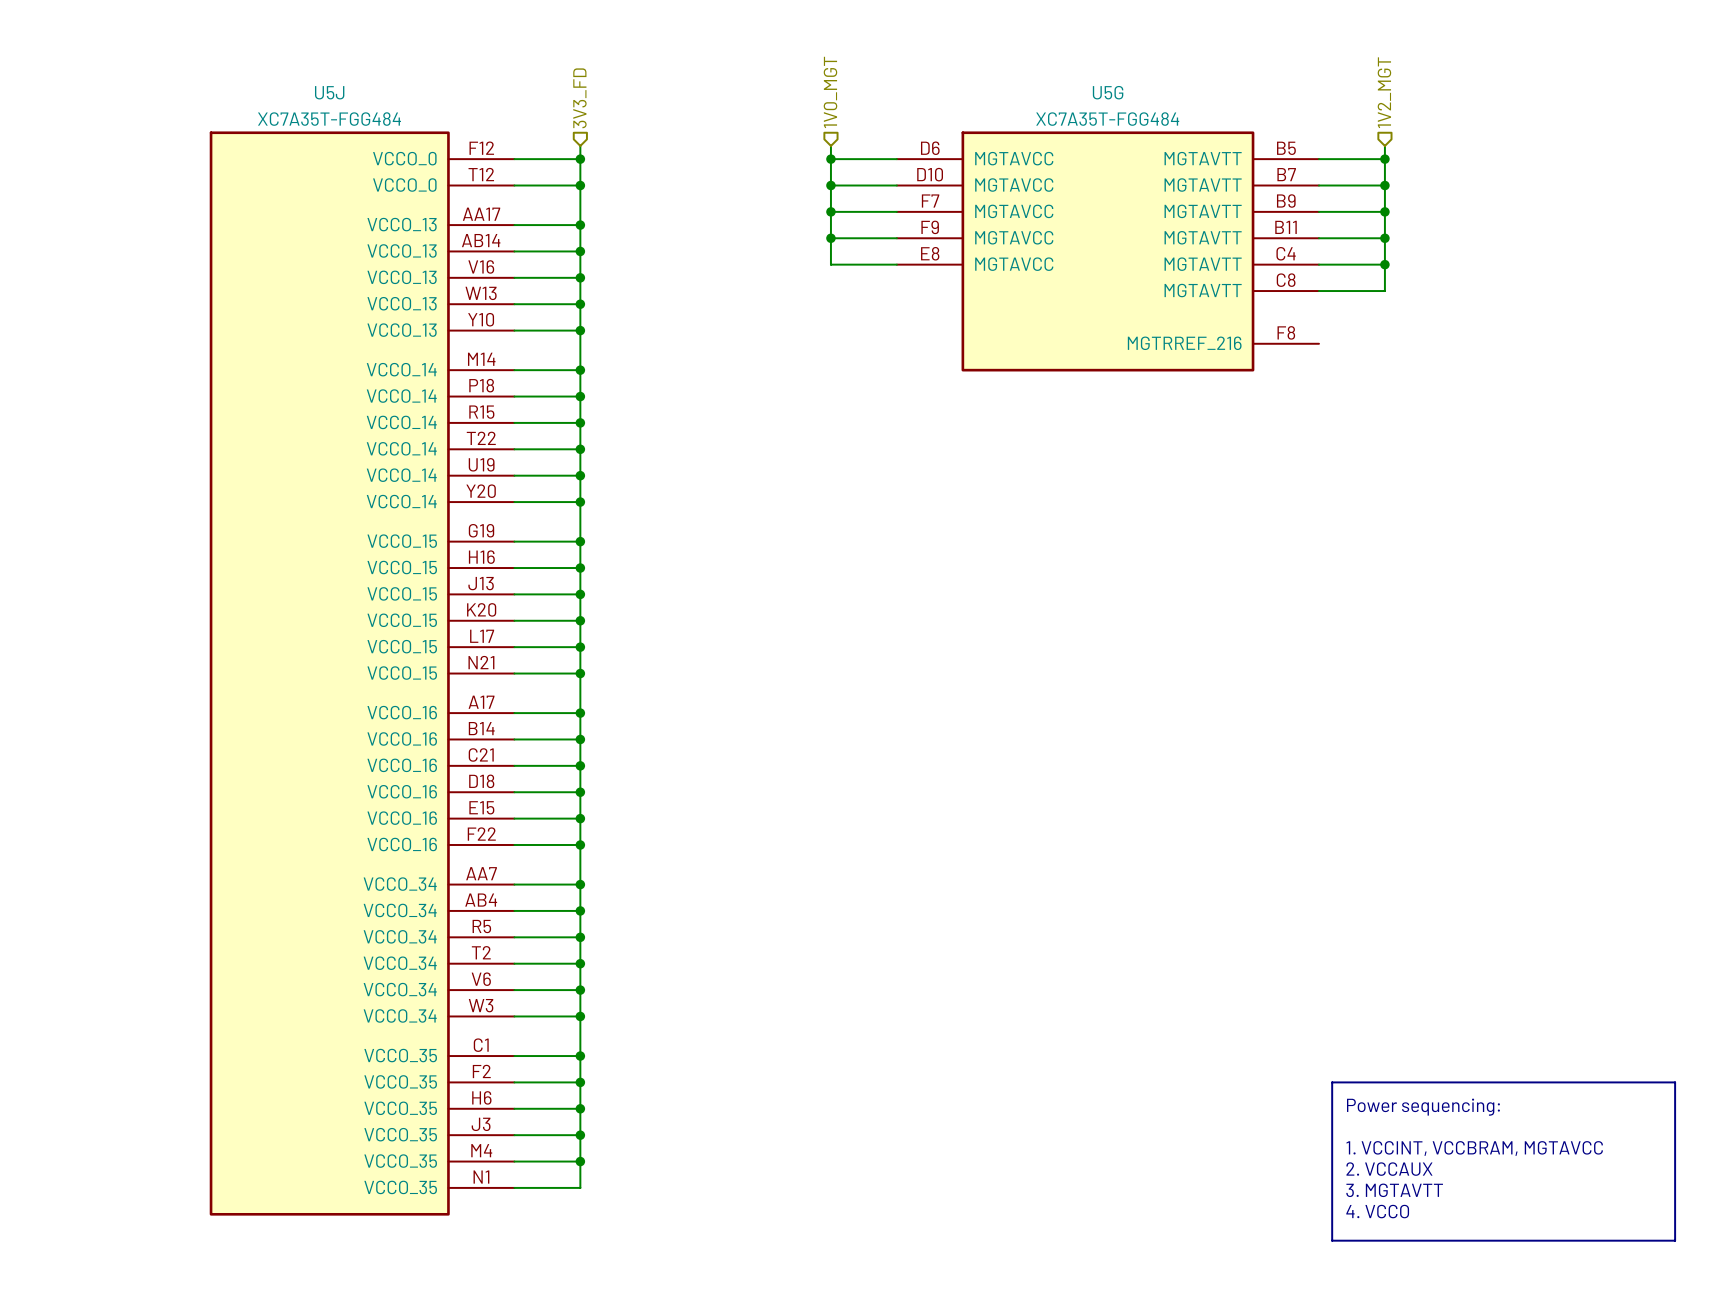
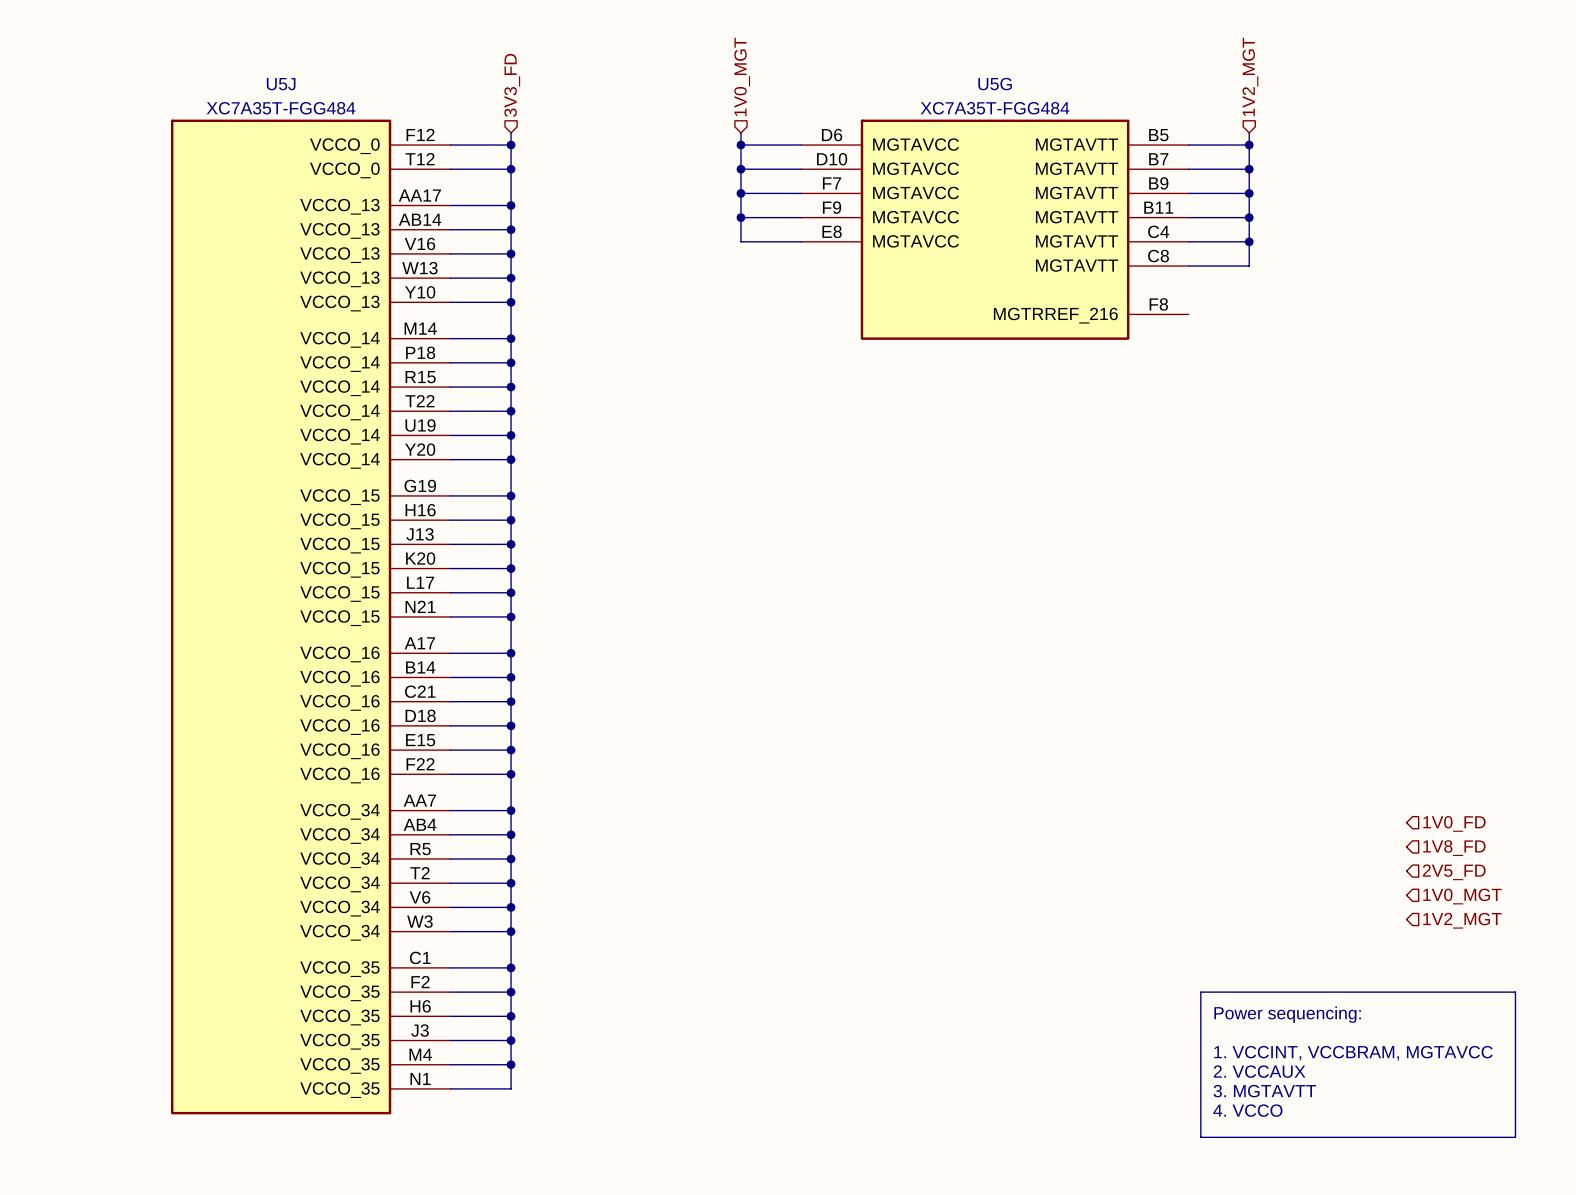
hierarchical label: none -> 1V0_FD (1454, 823)
hierarchical label: none -> 1V8_FD (1454, 848)
hierarchical label: none -> 2V5_FD (1454, 872)
hierarchical label: none -> 1V0_MGT (1462, 896)
hierarchical label: none -> 1V2_MGT (1462, 920)

